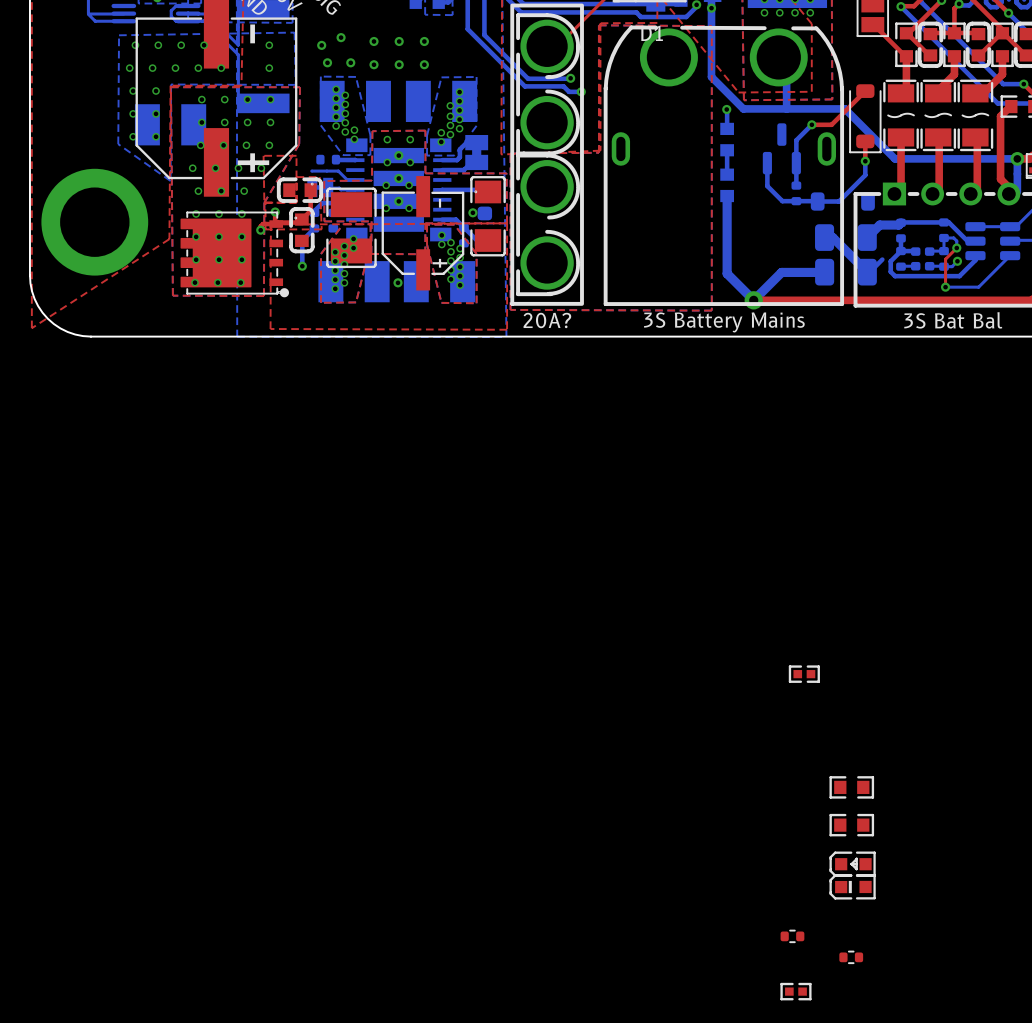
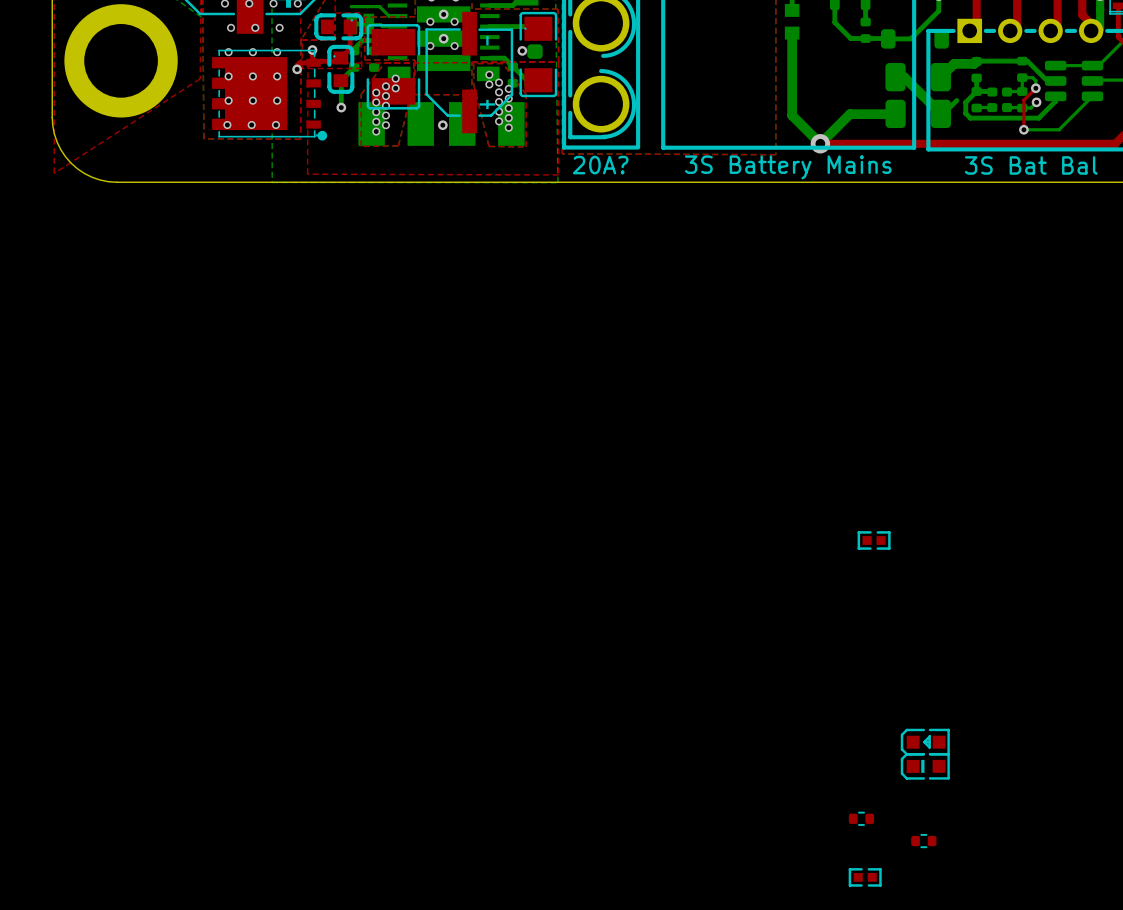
part: (851, 787) -> none
part: (851, 825) -> none

